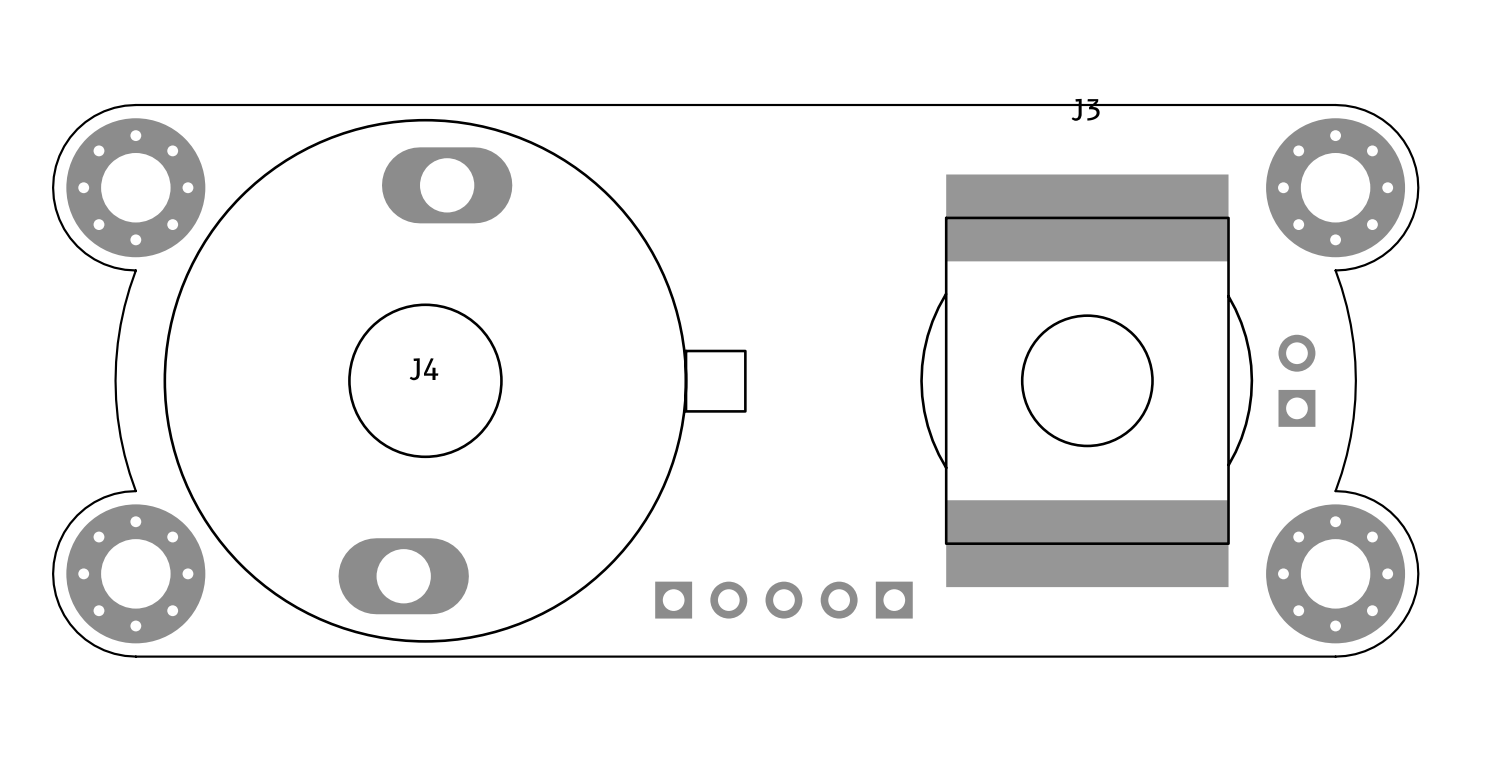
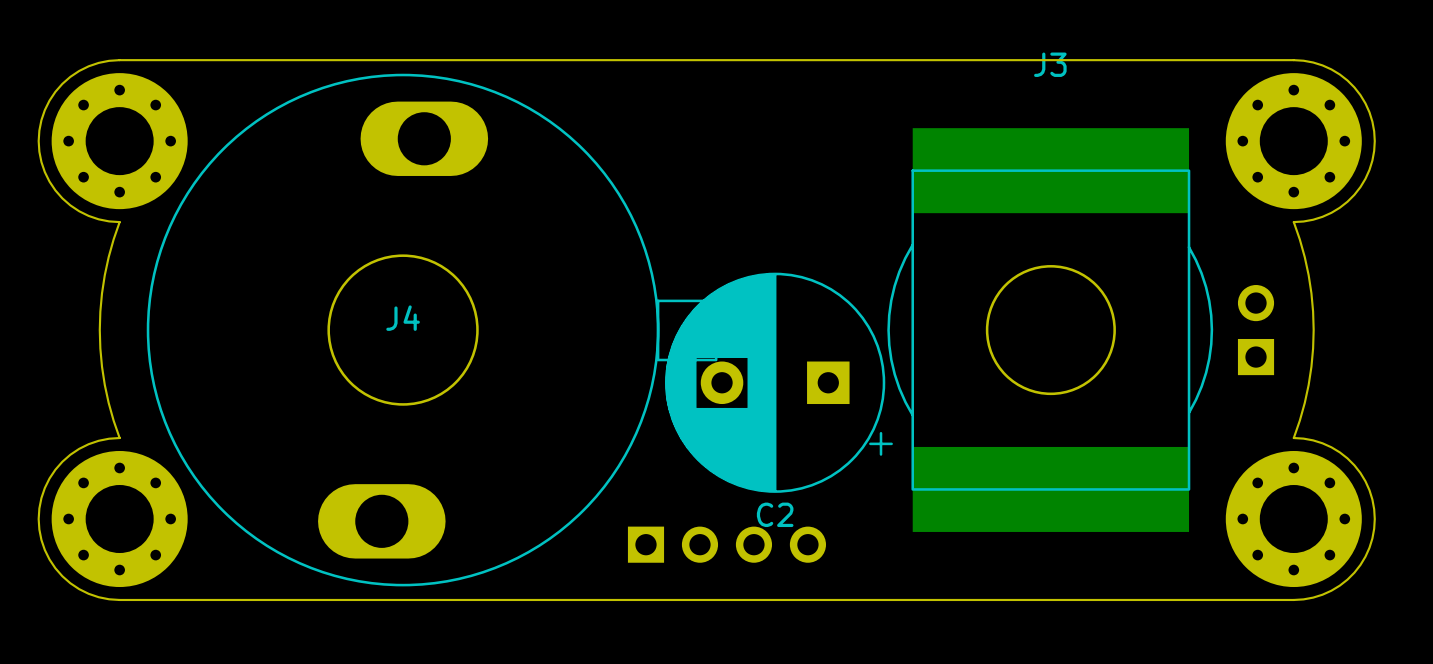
C2: none -> (778, 382)
part: (894, 600) -> none

